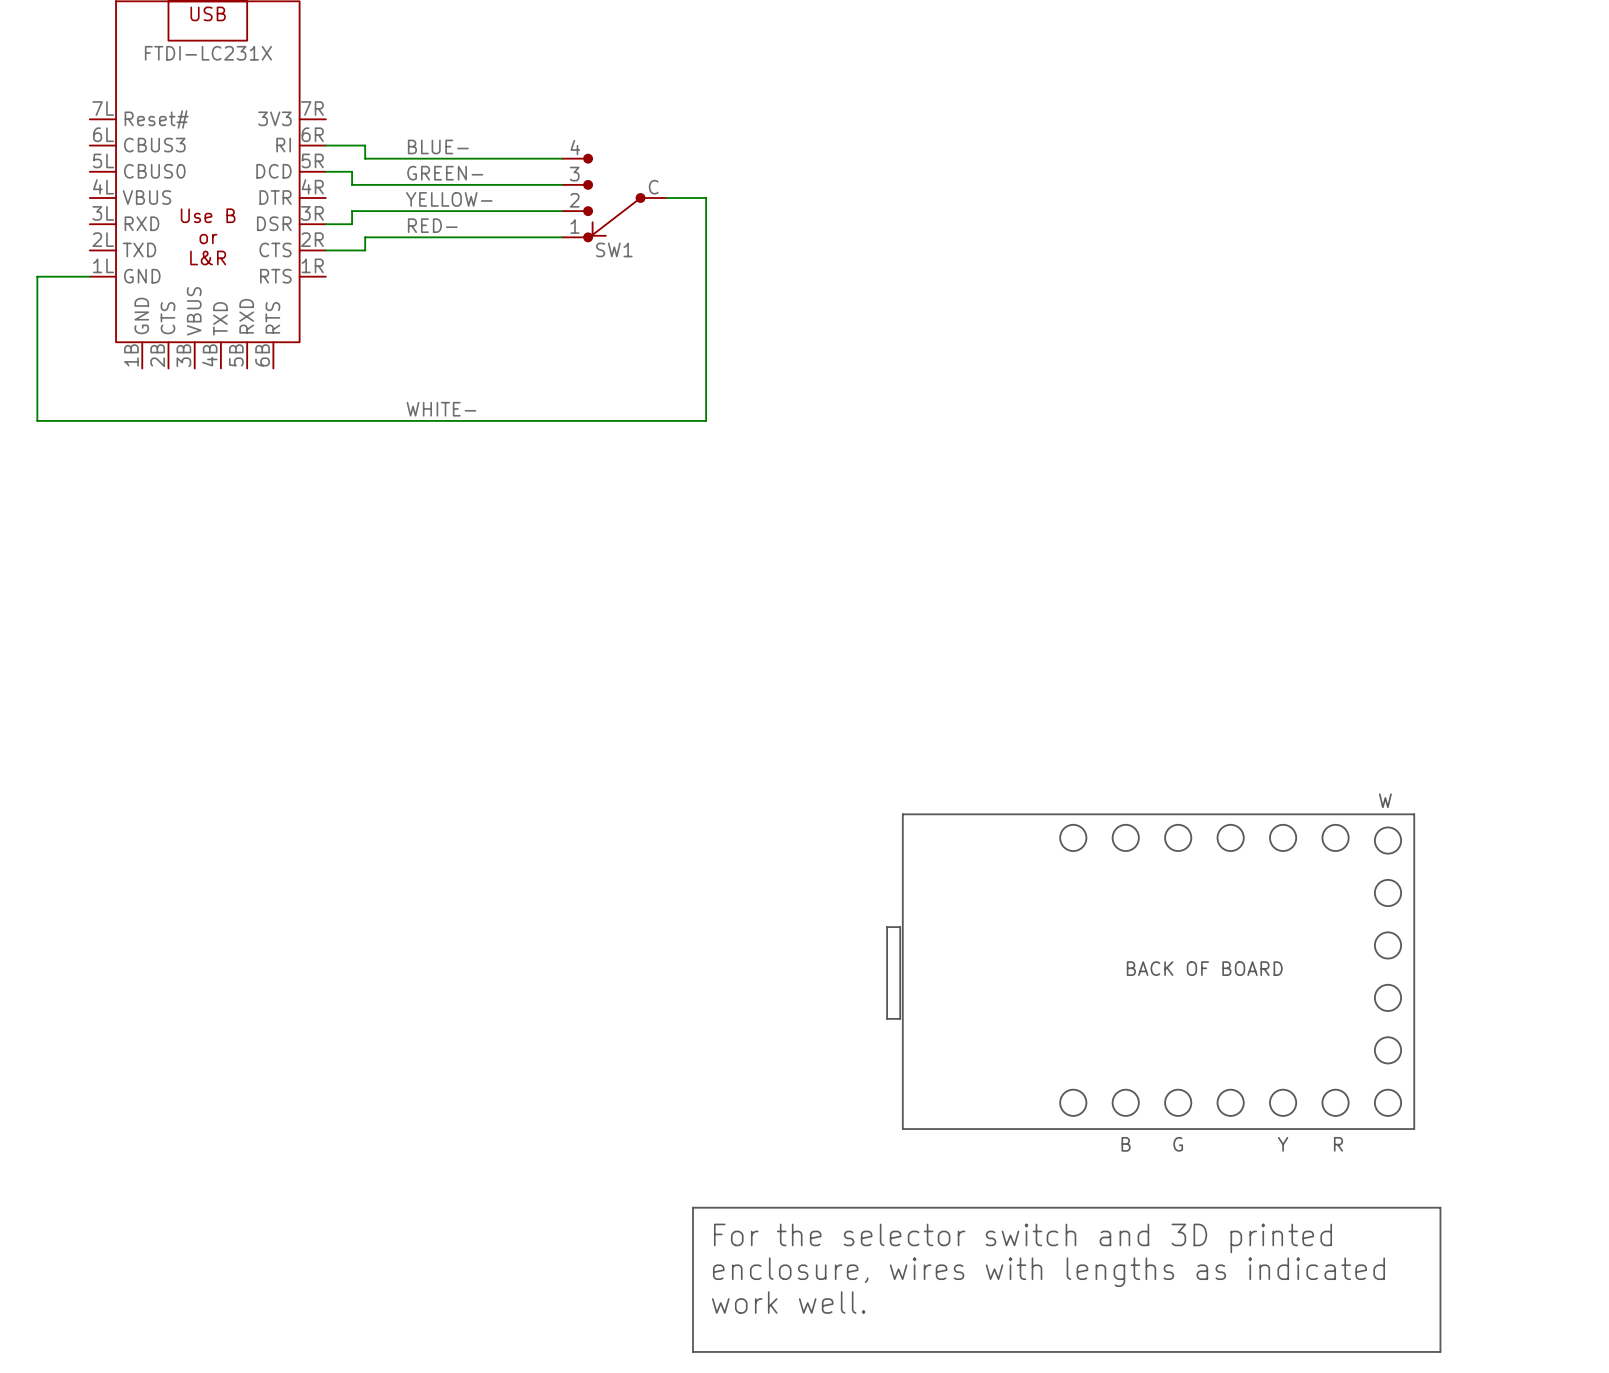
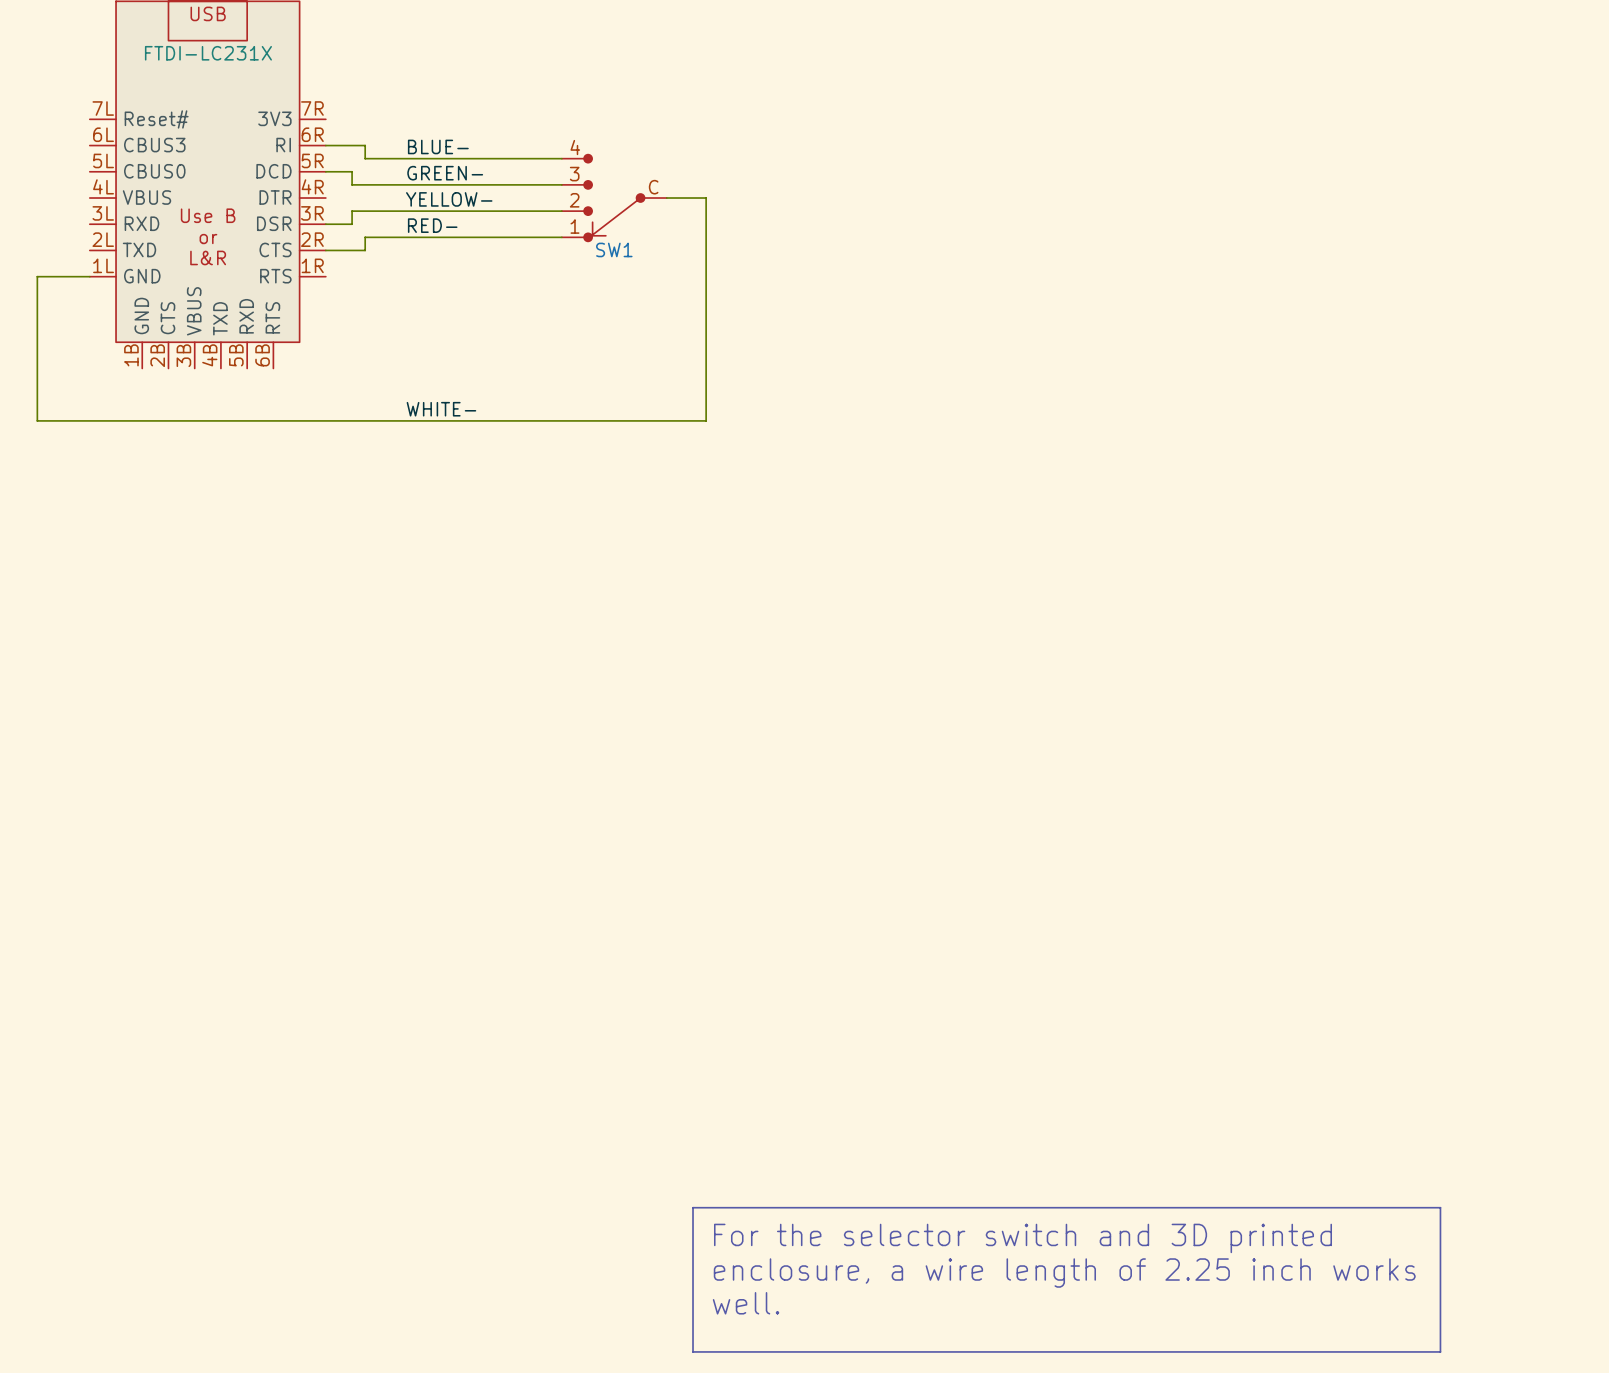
text: W (1385, 800) -> none
line: (902, 814) (1414, 814) (1414, 1129) (902, 1129) (902, 814) -> none
drawing: [1060, 824, 1087, 852] -> none
drawing: [1112, 824, 1139, 852] -> none
drawing: [1165, 824, 1192, 852] -> none
drawing: [1217, 824, 1244, 852] -> none
drawing: [1269, 824, 1297, 852] -> none
drawing: [1322, 824, 1349, 852] -> none
drawing: [1374, 827, 1402, 854] -> none
drawing: [1374, 879, 1402, 907] -> none
line: (887, 927) (900, 927) (900, 1018) (887, 1018) (887, 927) -> none
drawing: [1374, 932, 1402, 959] -> none
text: BACK OF BOARD (1204, 968) -> none
drawing: [1374, 984, 1402, 1012] -> none
drawing: [1374, 1037, 1402, 1064] -> none
drawing: [1060, 1089, 1087, 1116] -> none
drawing: [1112, 1089, 1139, 1116] -> none
drawing: [1165, 1089, 1192, 1116] -> none
drawing: [1217, 1089, 1244, 1116] -> none
drawing: [1269, 1089, 1297, 1116] -> none
drawing: [1322, 1089, 1349, 1116] -> none
drawing: [1374, 1089, 1402, 1116] -> none
text: B (1126, 1144) -> none
text: G (1178, 1144) -> none
text: Y (1283, 1144) -> none
text: R (1338, 1144) -> none
text: enclosure, wires with lengths as indicated (1048, 1272) -> enclosure, a wire length of 2.25 inch works (1064, 1273)
text: work well. (788, 1302) -> well. (746, 1303)

